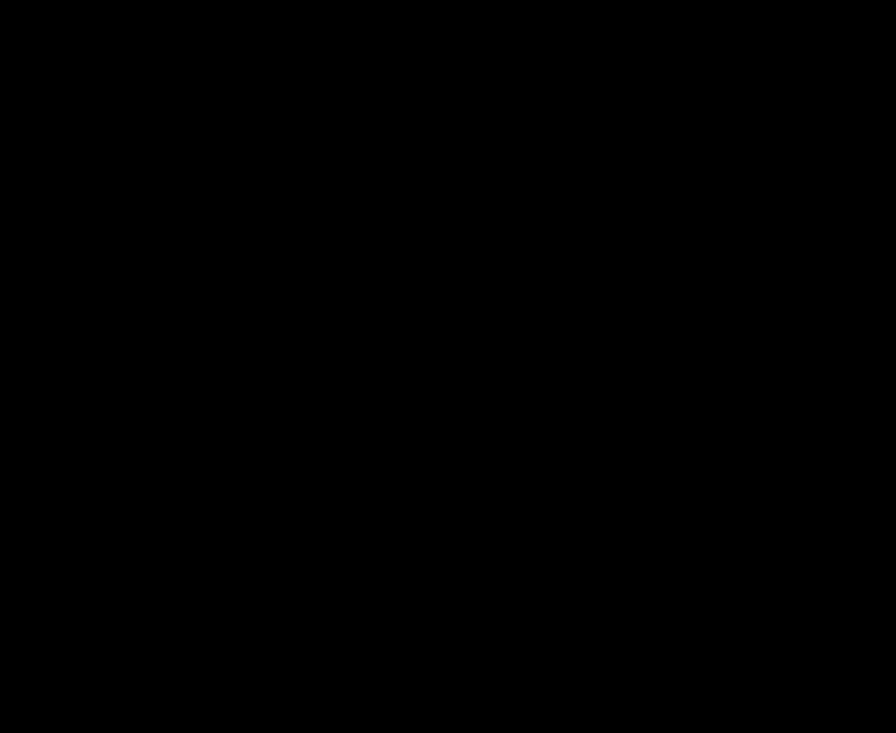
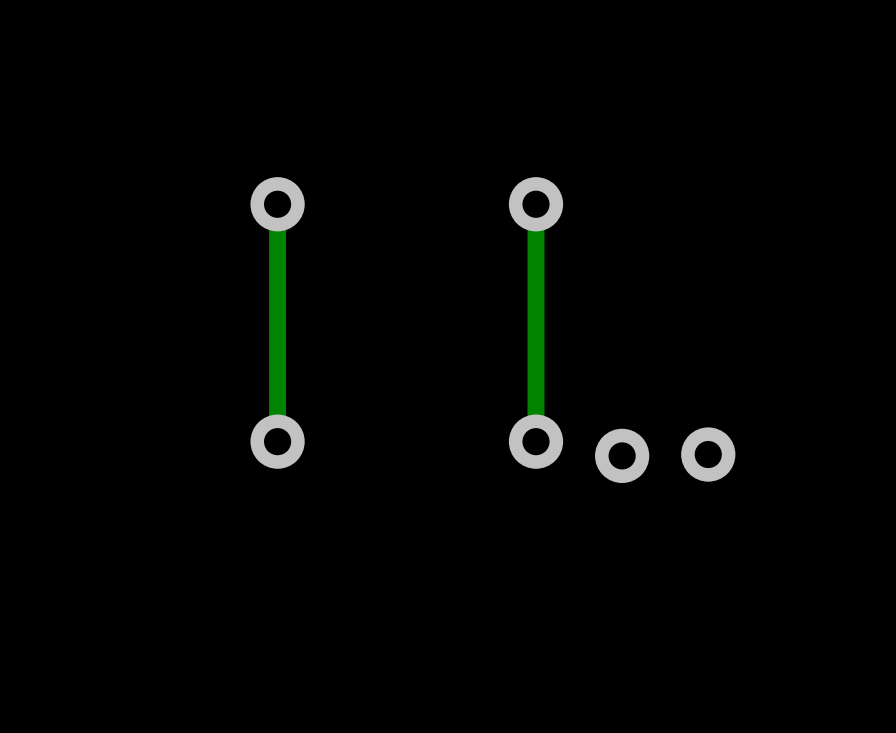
track: none -> (277, 204) (277, 441)
via: none -> (277, 204)
track: none -> (536, 204) (536, 441)
via: none -> (536, 204)
via: none -> (277, 441)
via: none -> (536, 441)
via: none -> (708, 454)
via: none -> (622, 455)

